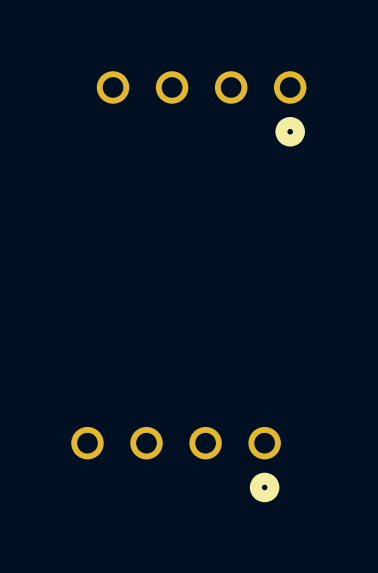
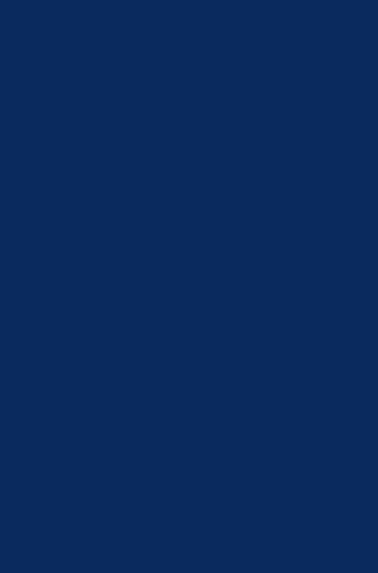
part: (201, 108) -> none
part: (176, 464) -> none

